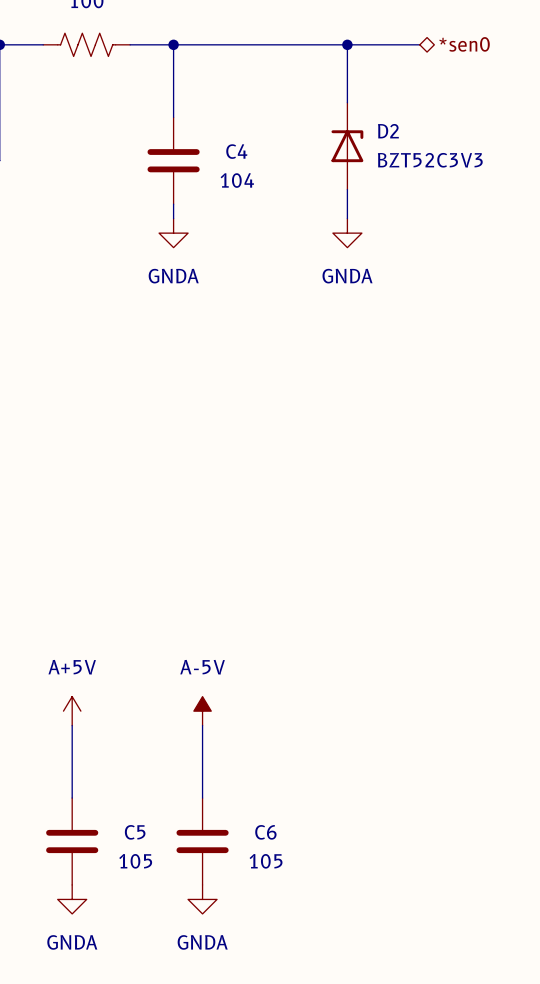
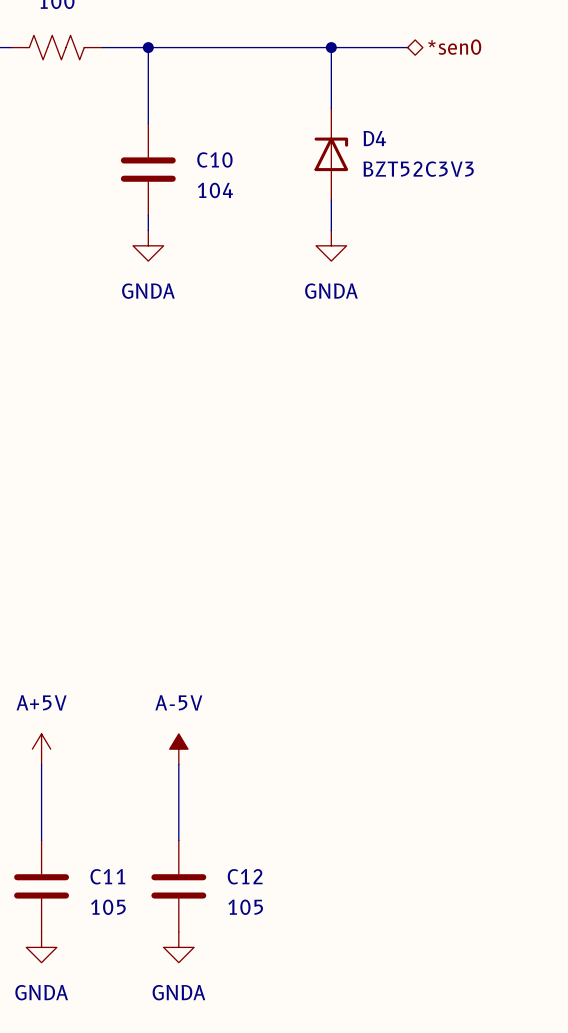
D2 name: D2 (388, 131) -> D4 (374, 138)
C4 name: C4 (236, 151) -> C10 (214, 159)
C5 name: C5 (135, 832) -> C11 (107, 876)
C6 name: C6 (265, 832) -> C12 (245, 876)

